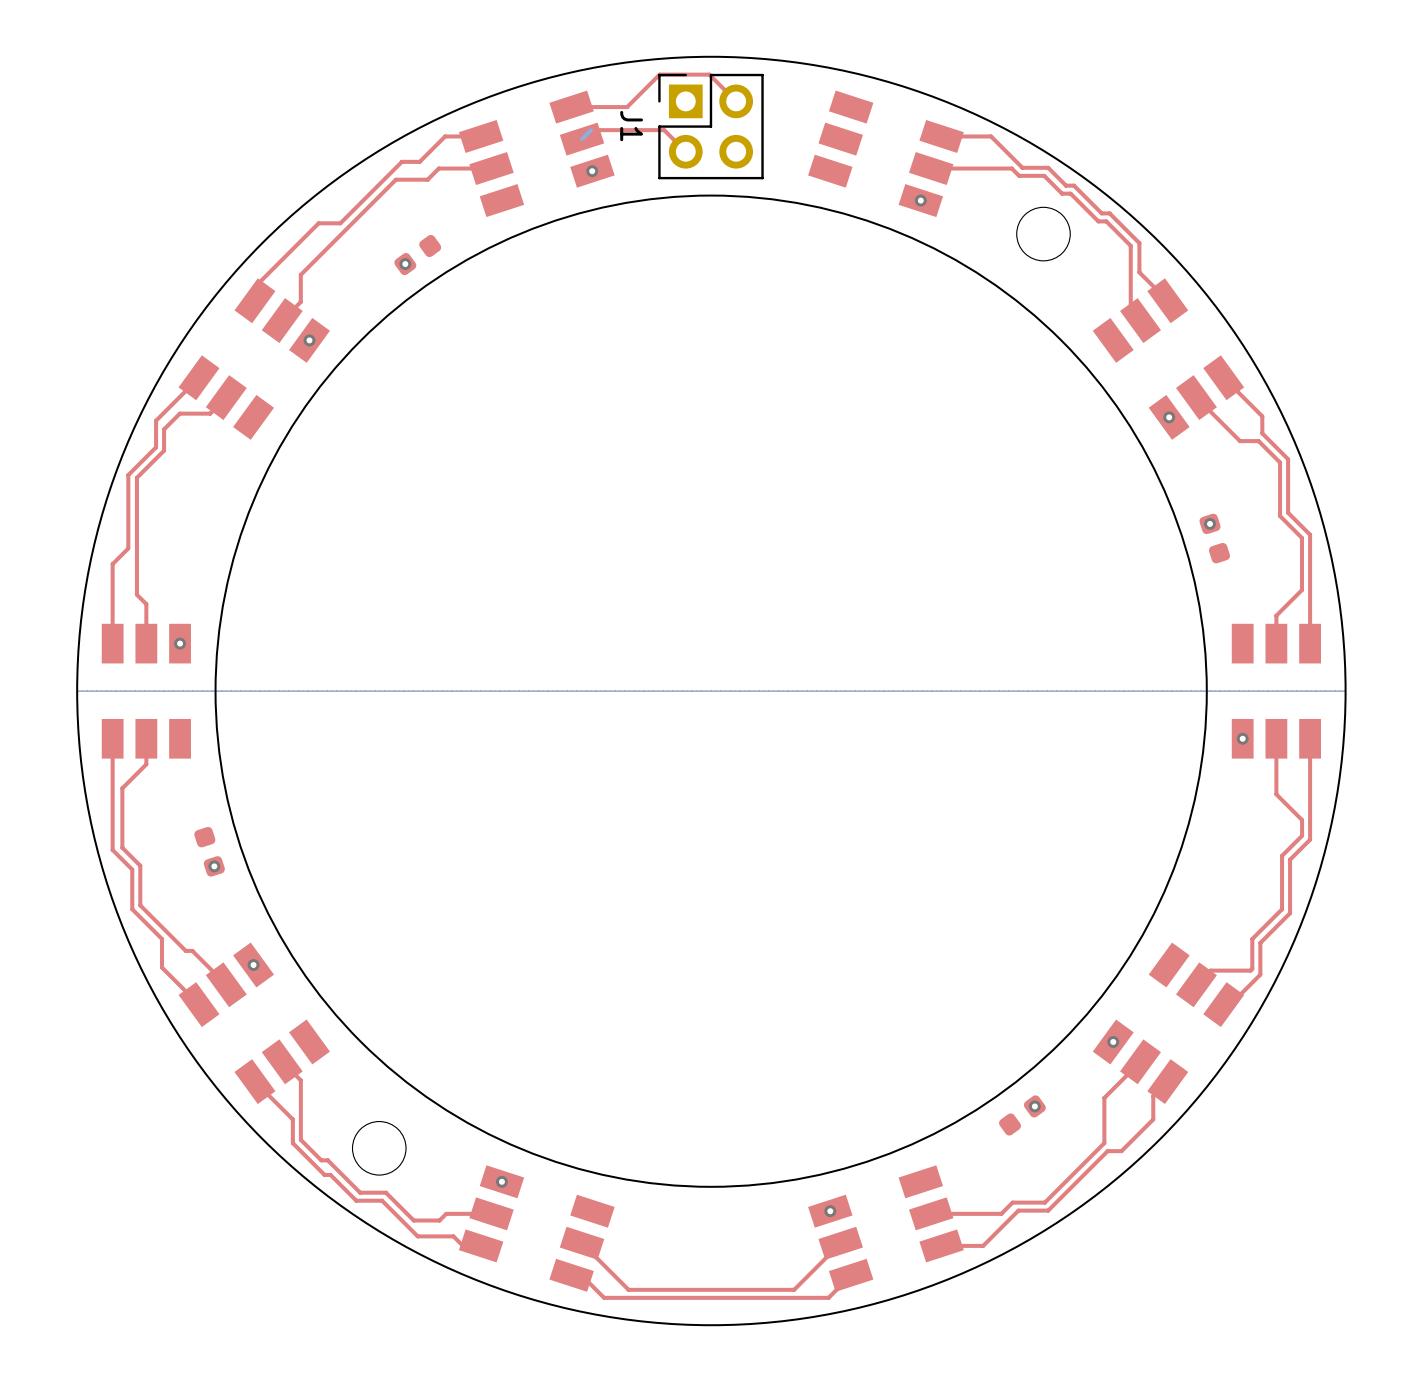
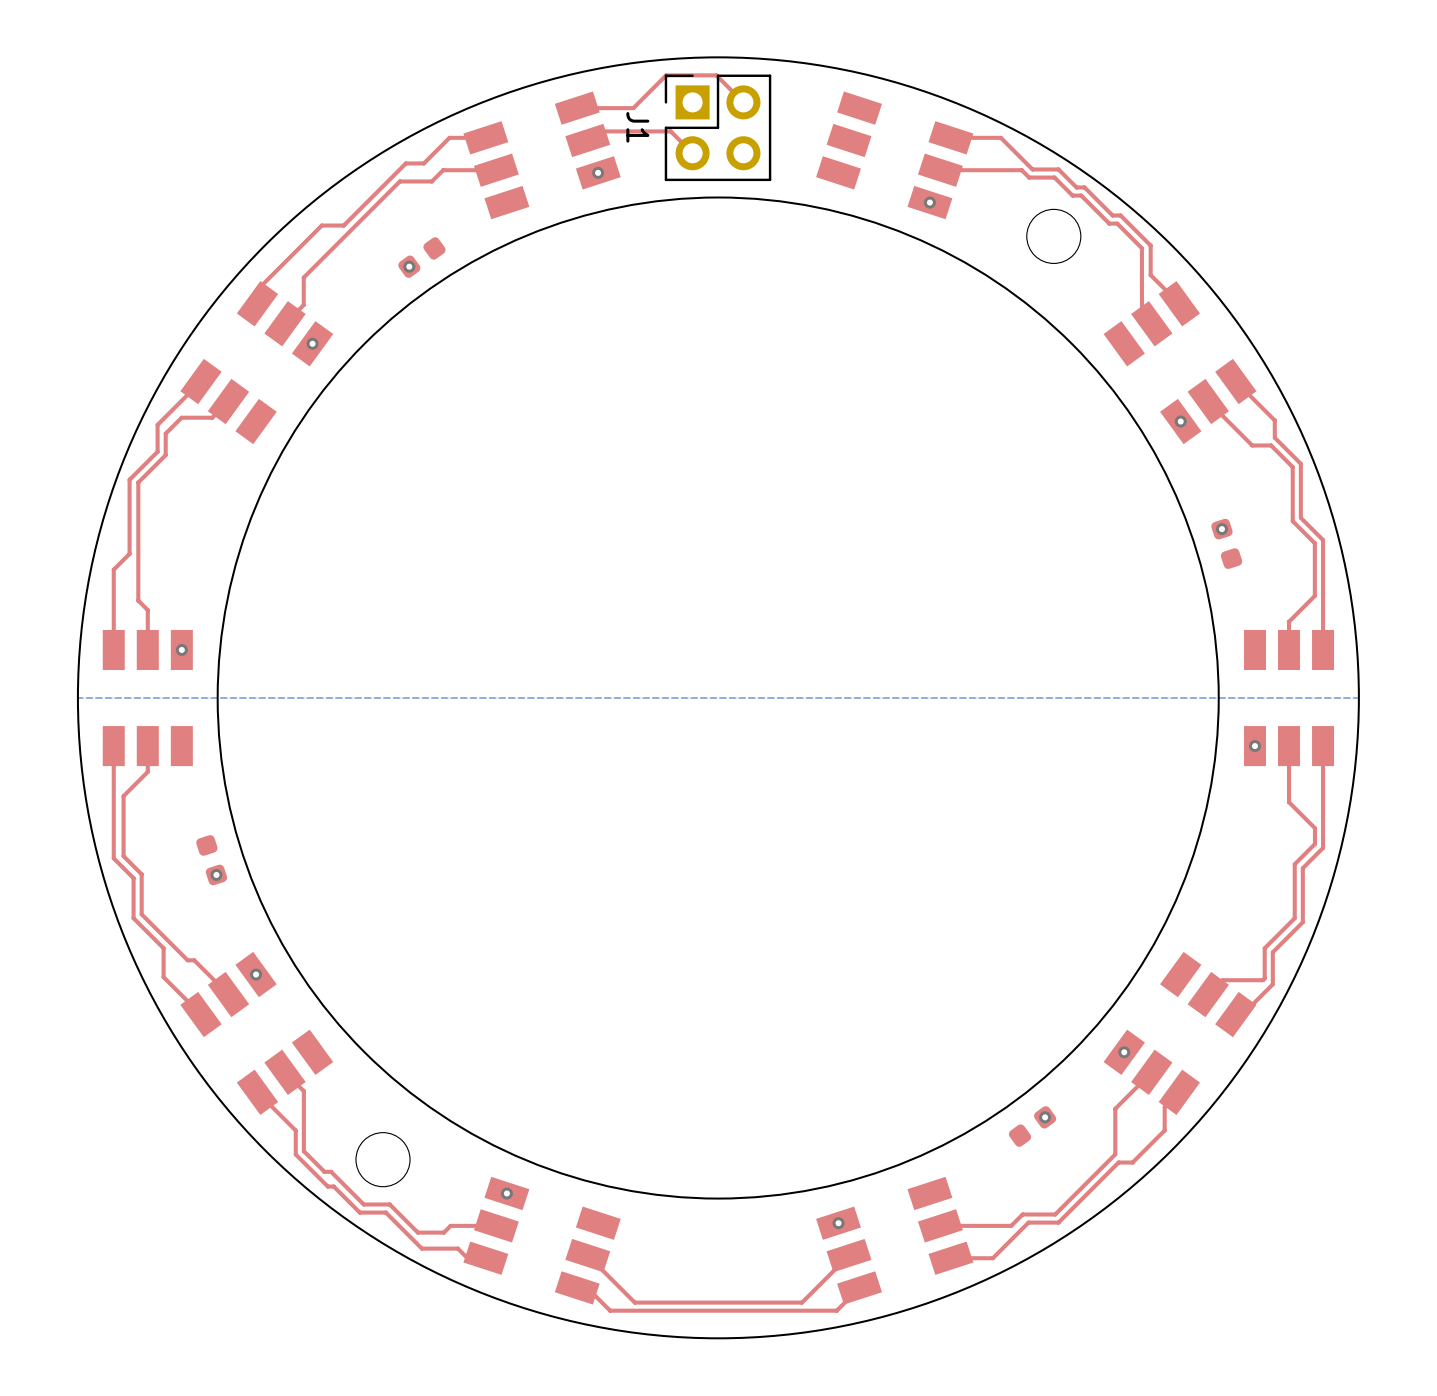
bottom track: (590, 130) (582, 139) -> none

